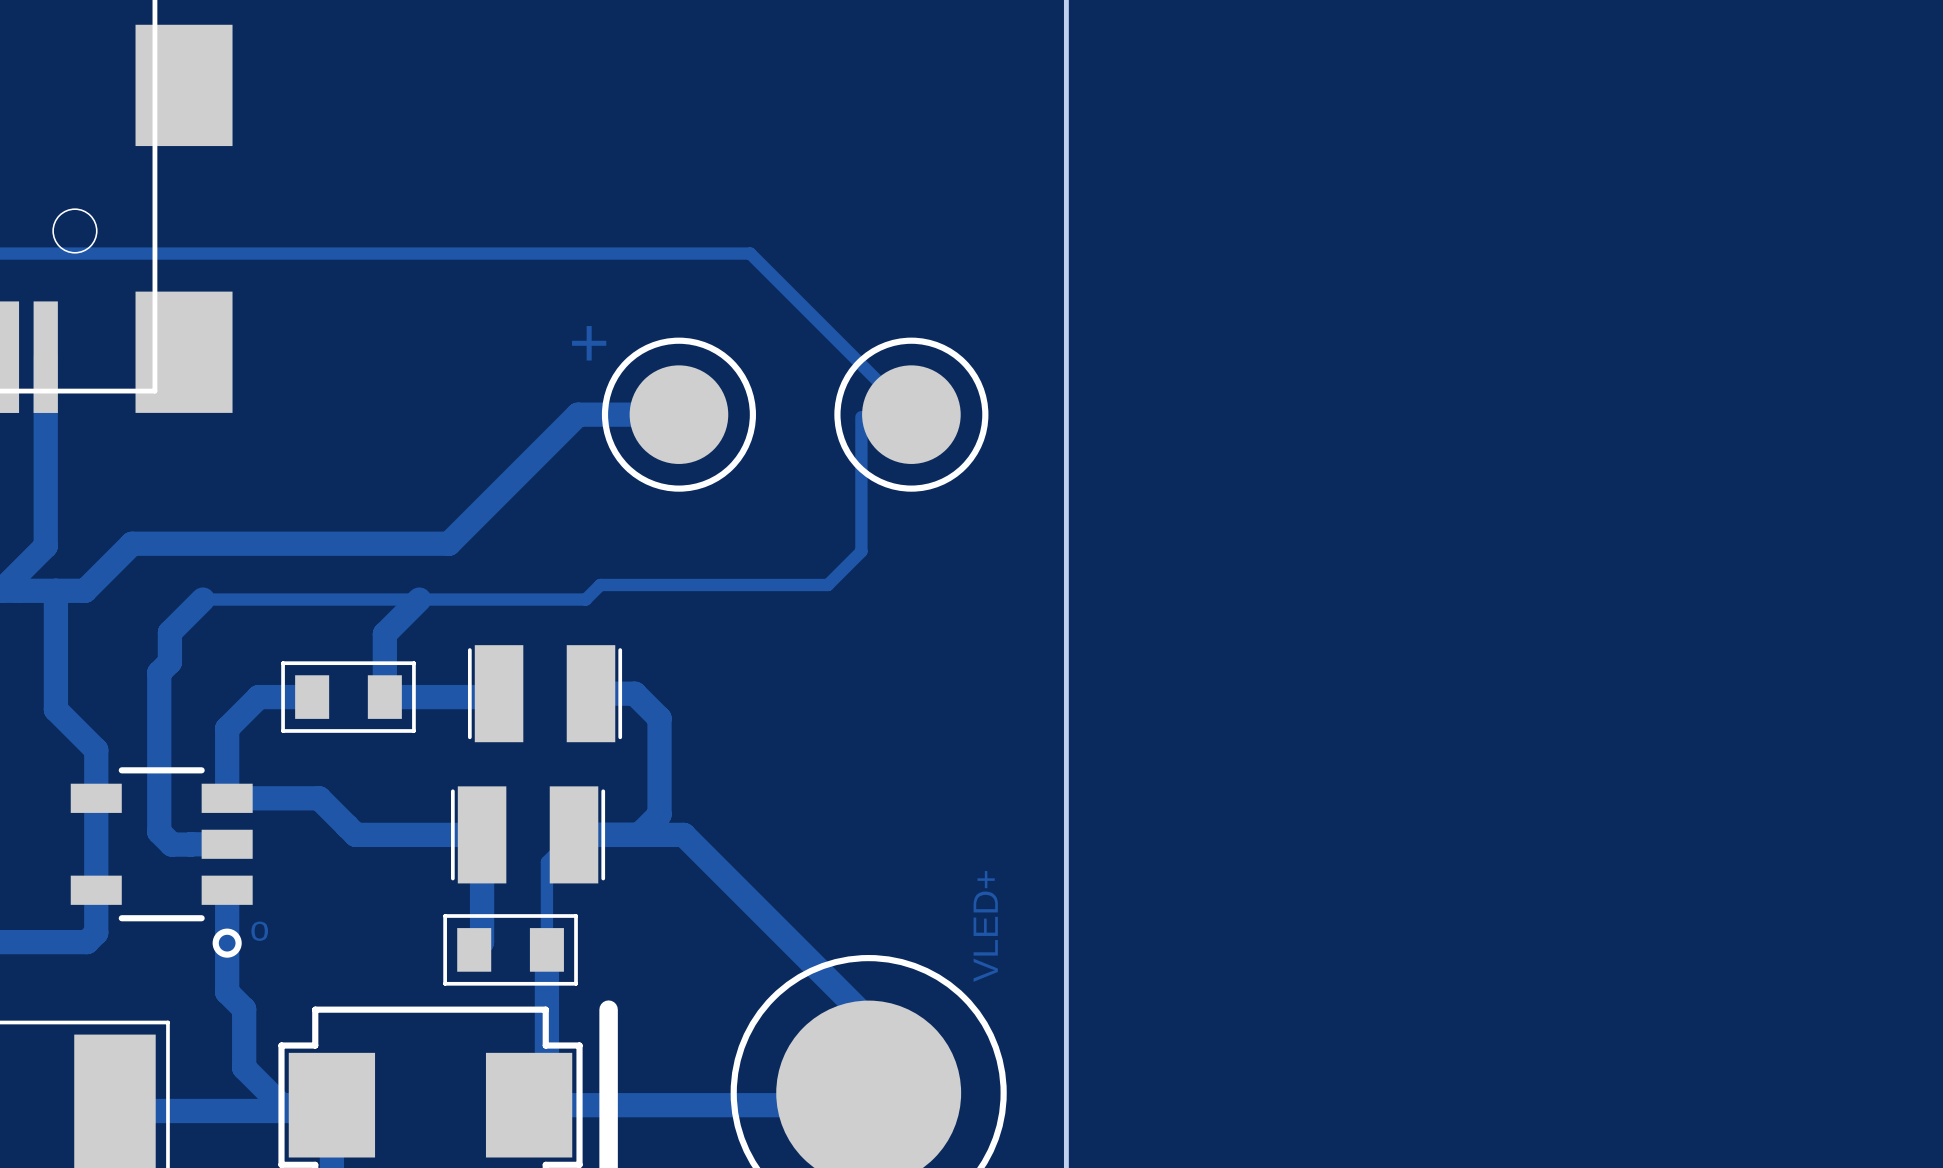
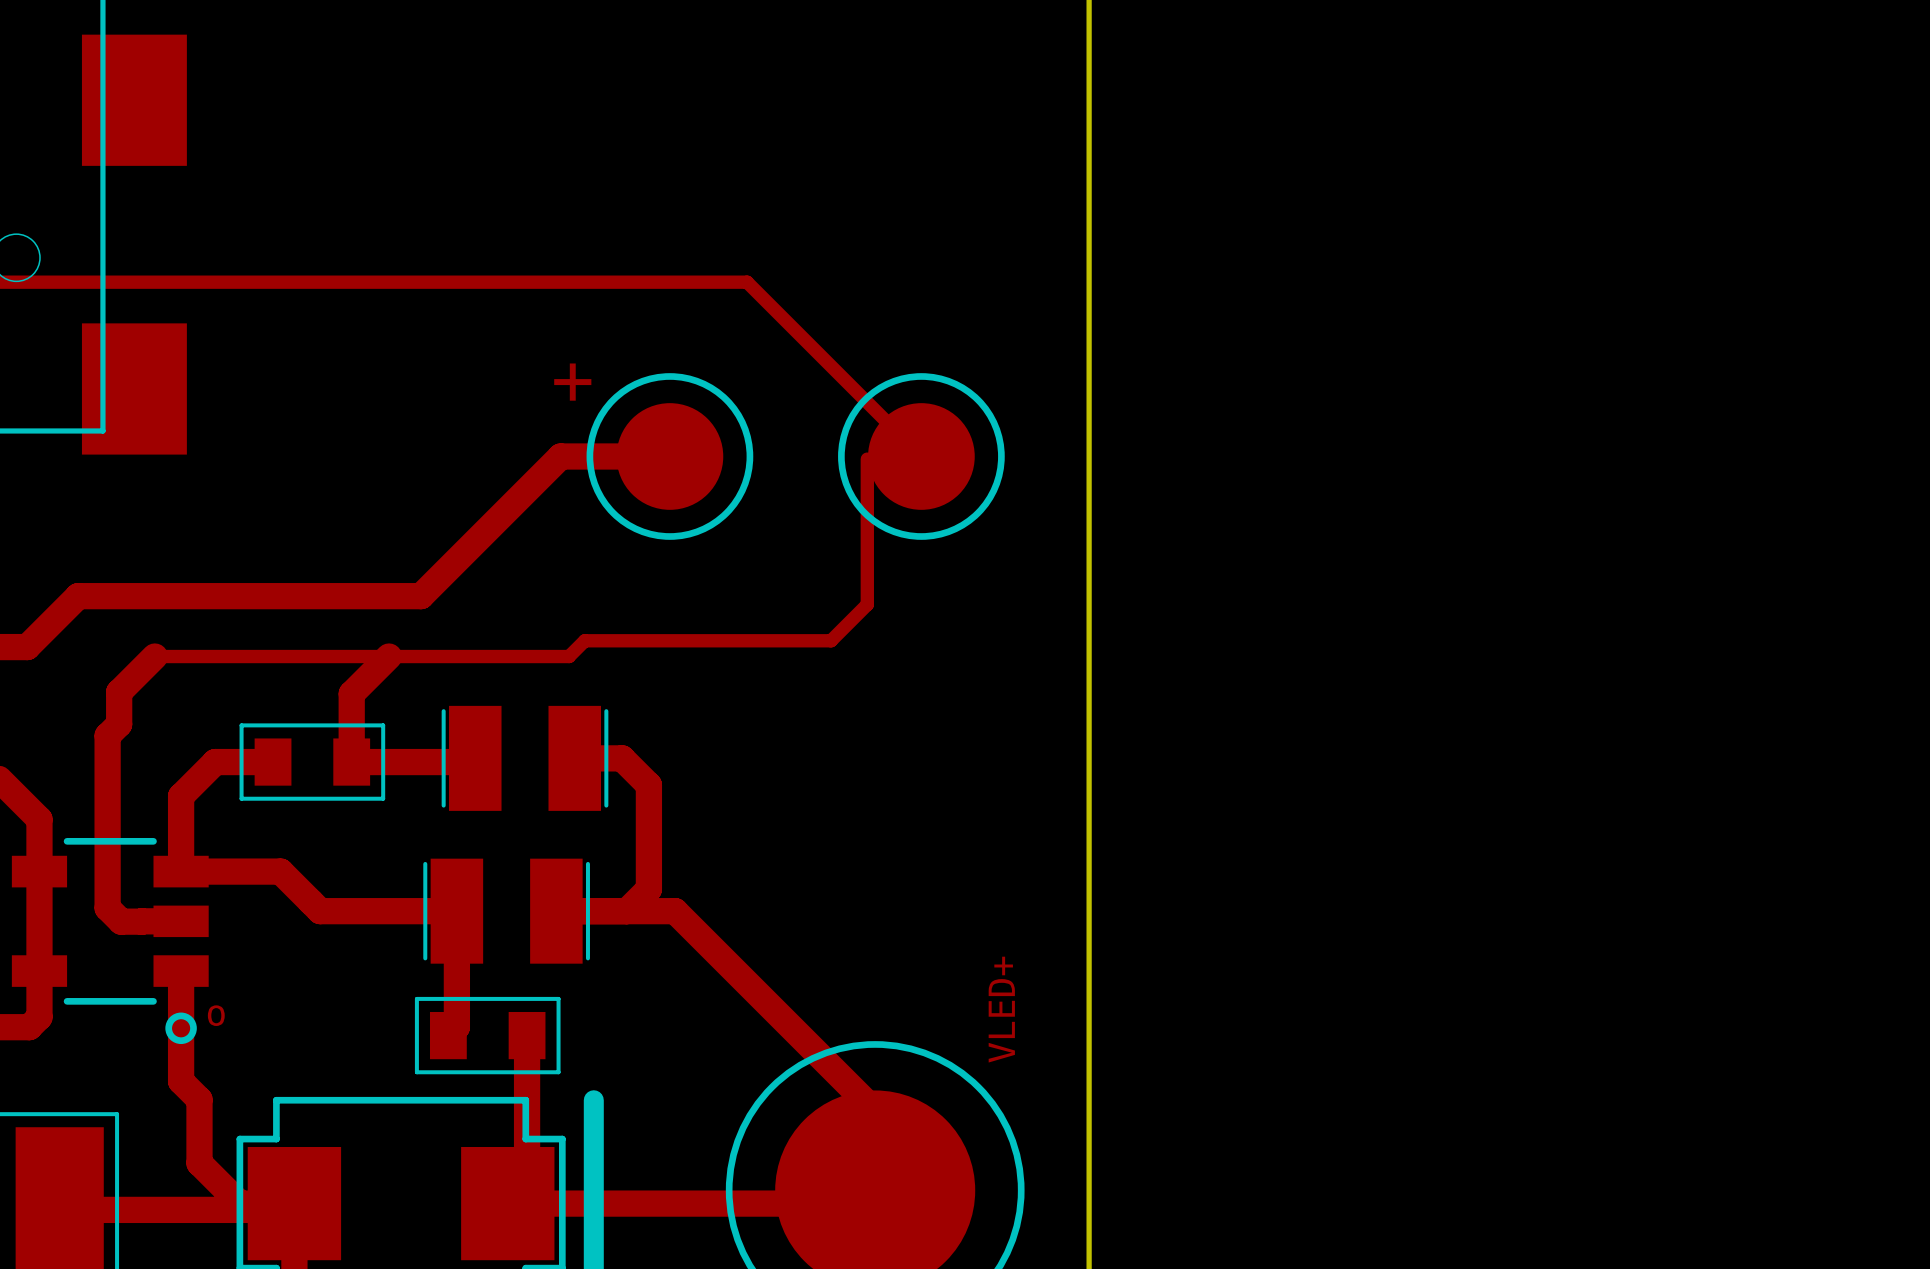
track: (574, 834) (546, 861) (546, 949) -> none

